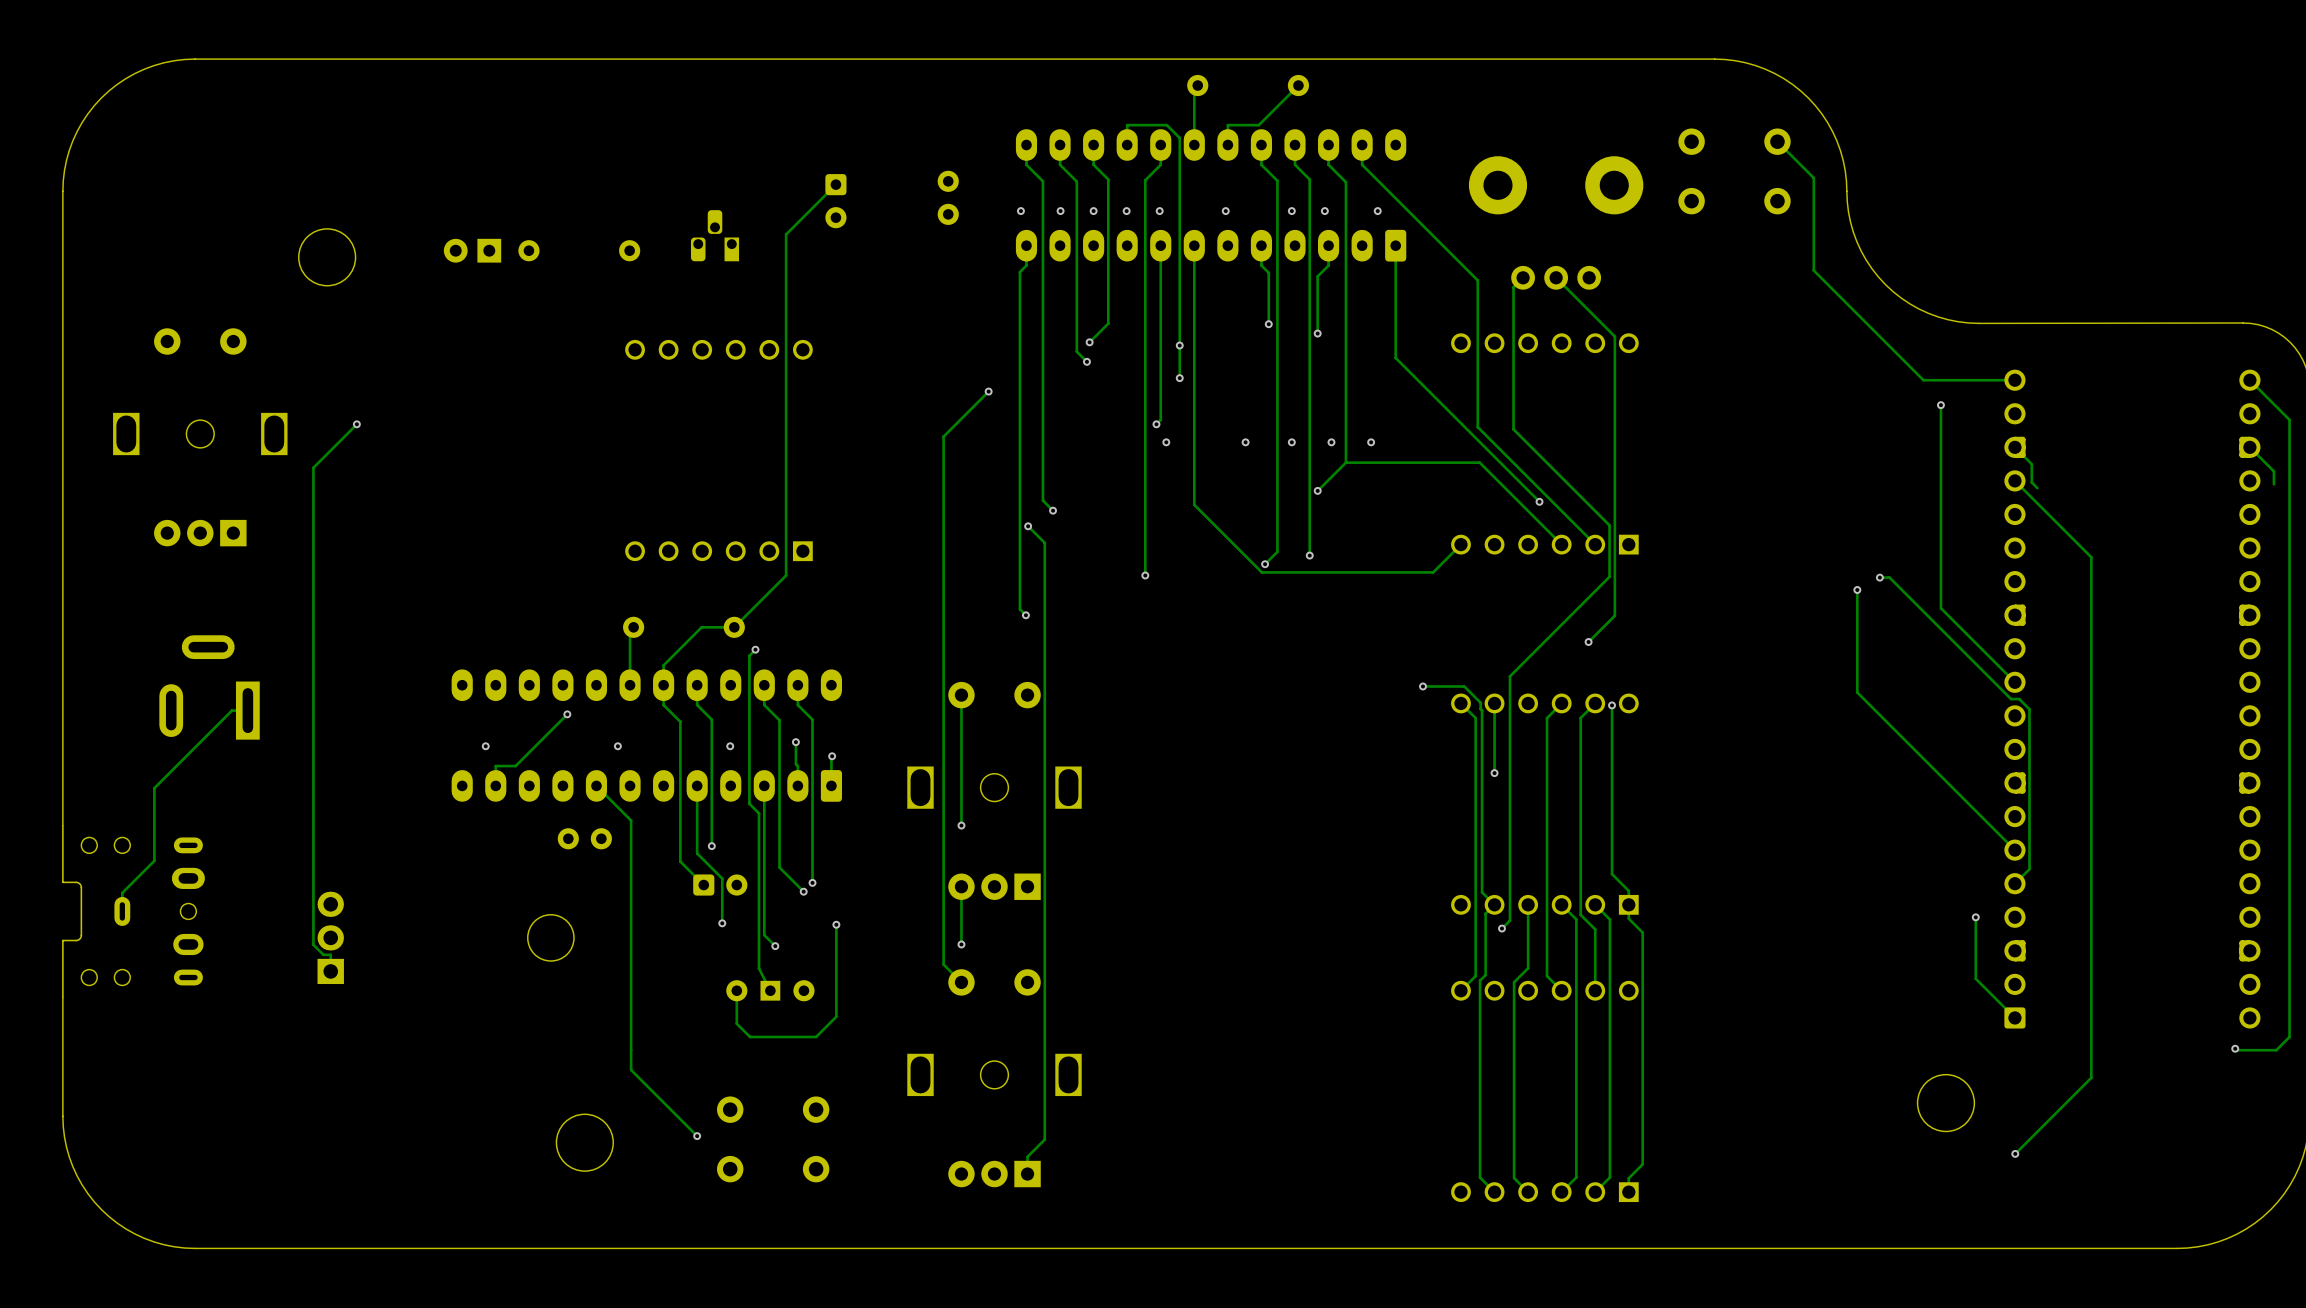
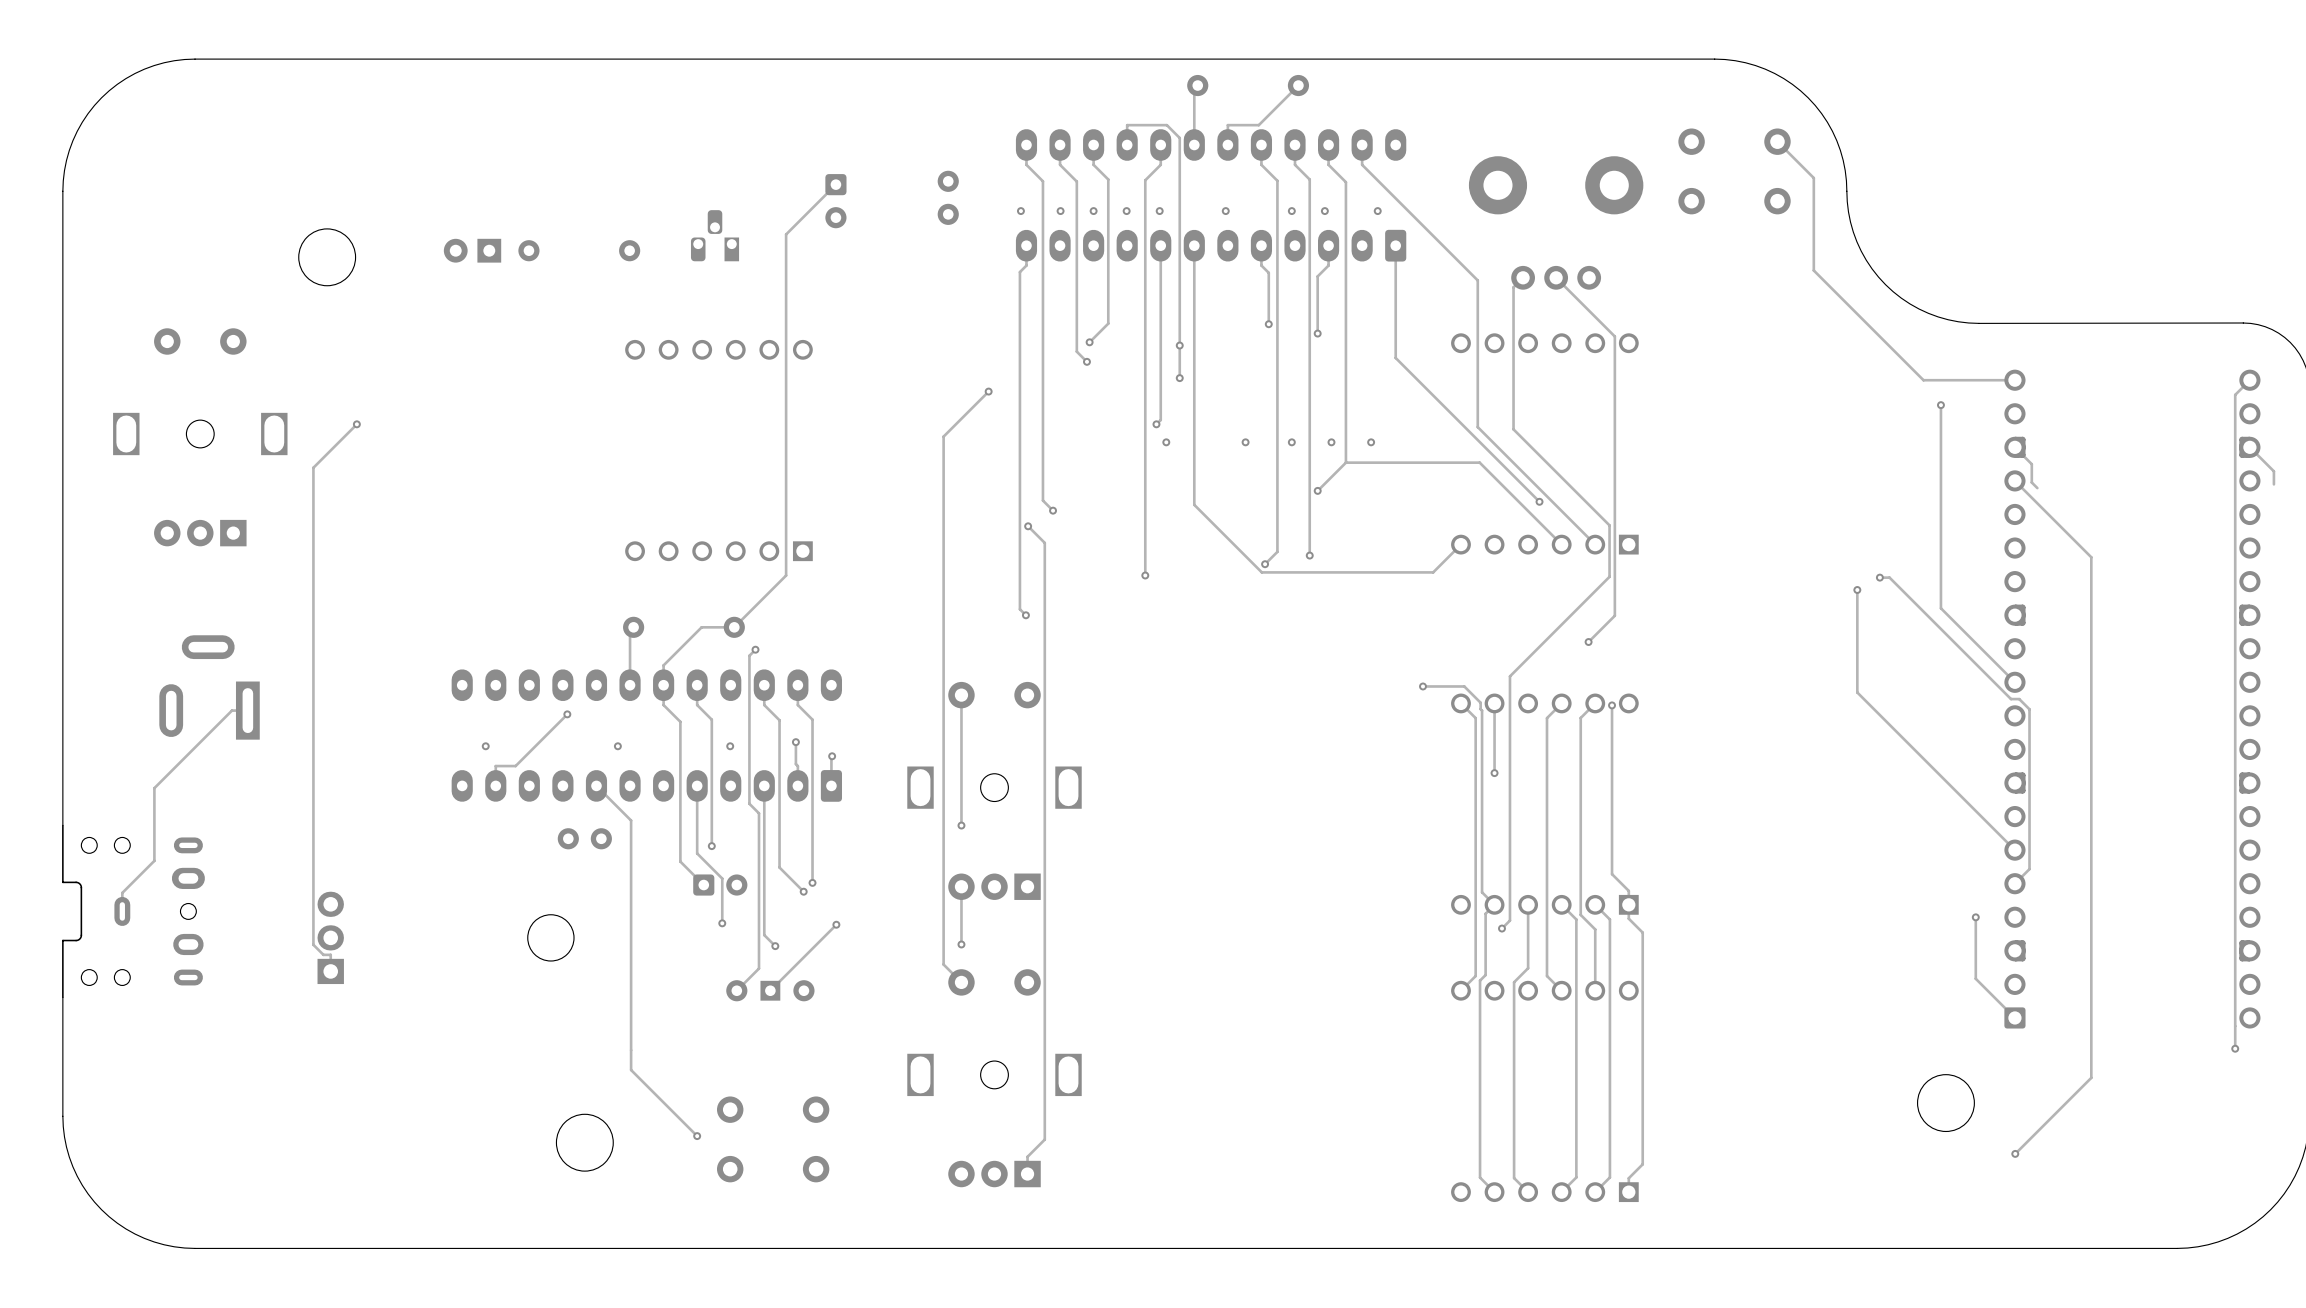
track: (2249, 380) (2289, 419) (2289, 1036) (2276, 1050) (2235, 1048) -> (2249, 380) (2235, 394) (2235, 1048)
track: (836, 924) (836, 1016) (816, 1036) (750, 1036) (736, 1023) (736, 990) -> (836, 924) (770, 990)
track: (759, 968) (770, 990) -> (759, 968) (736, 990)

